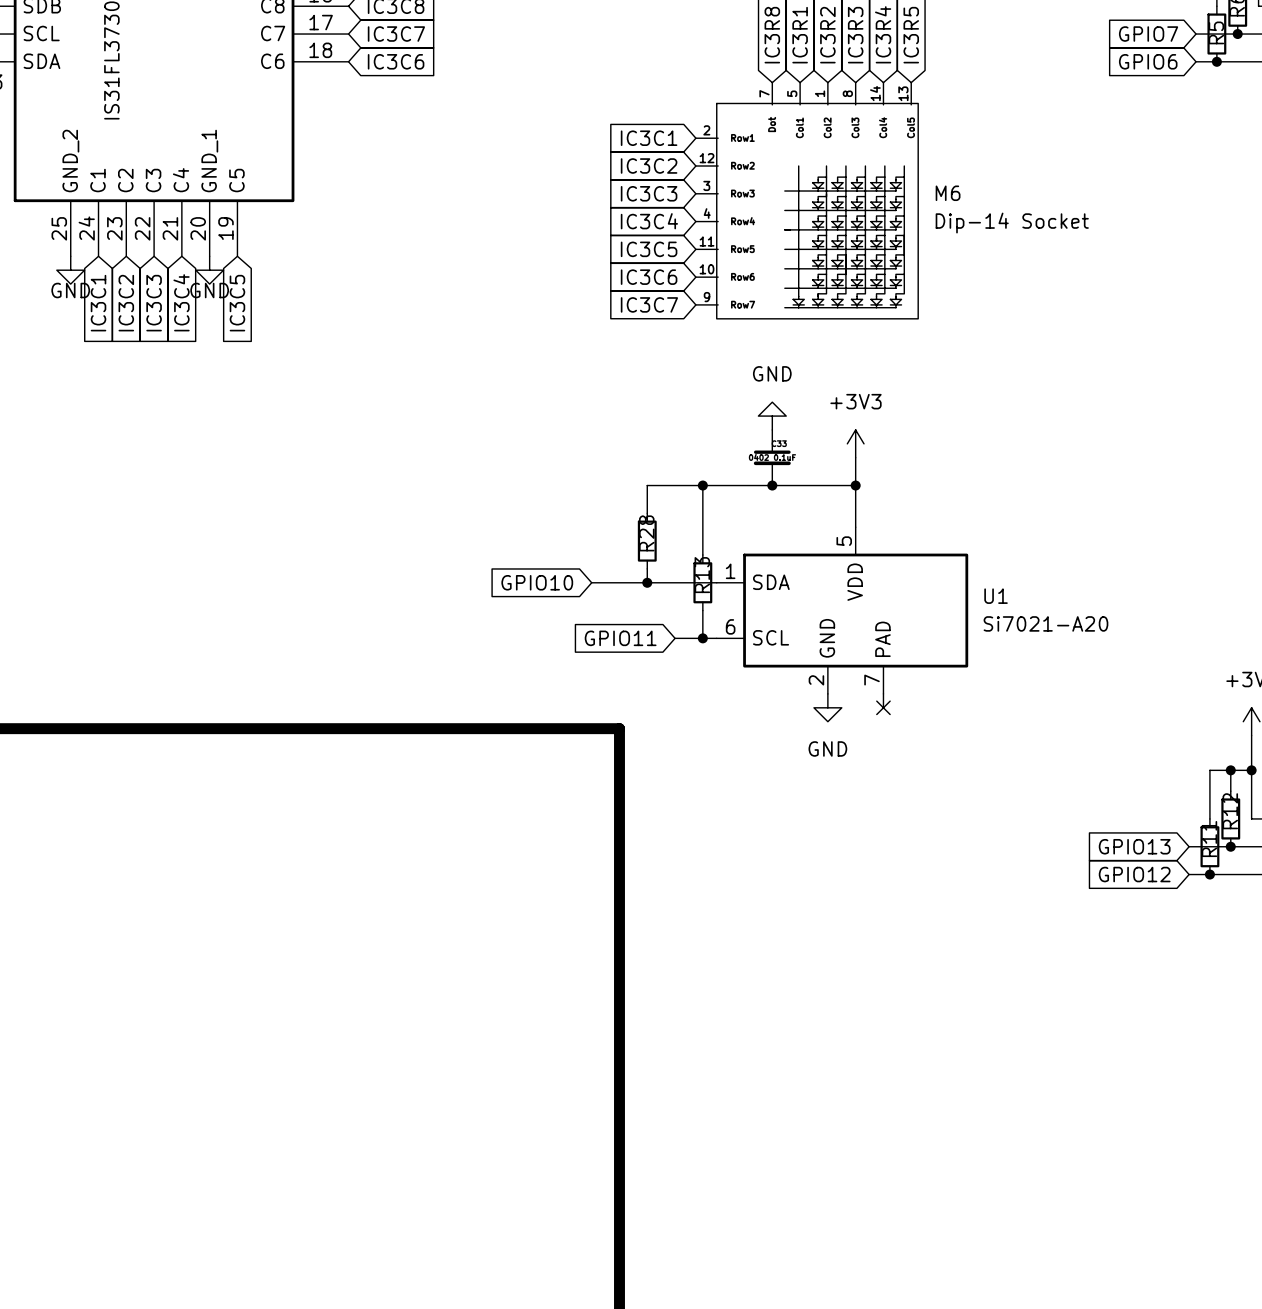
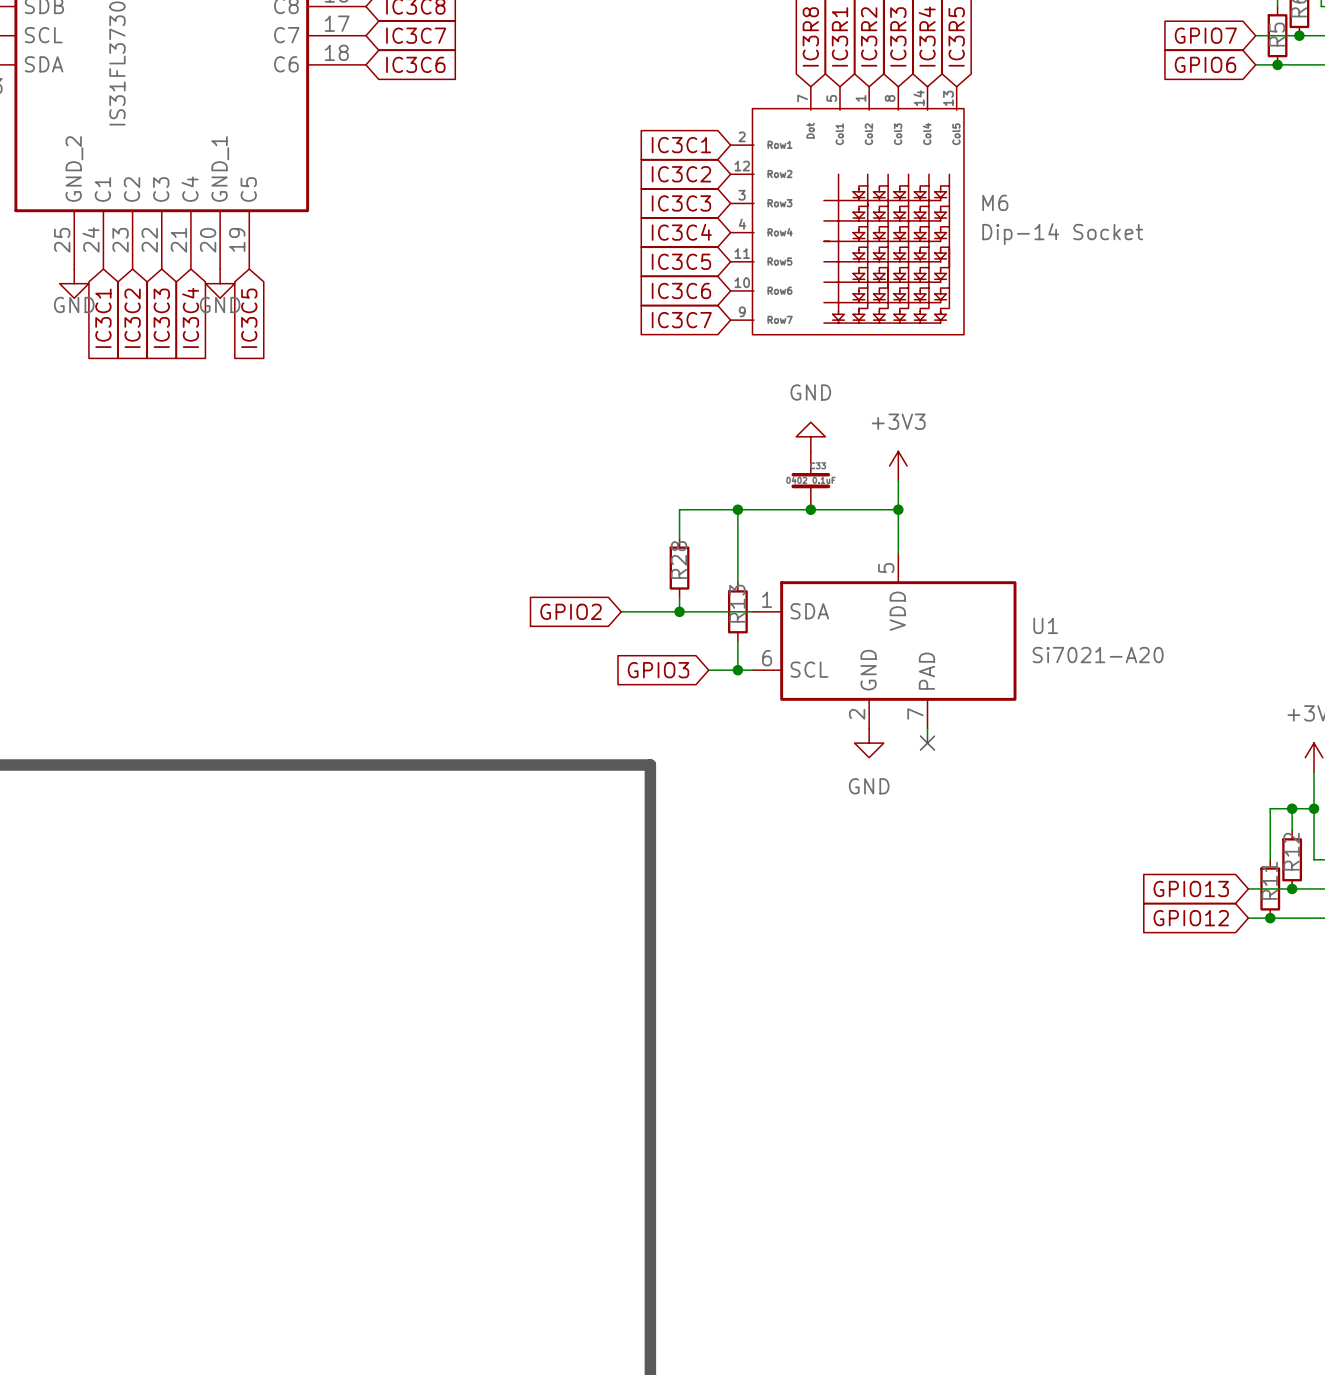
global label: GPIO10 (537, 582) -> GPIO2 (571, 611)
global label: GPIO11 (620, 638) -> GPIO3 (658, 670)

